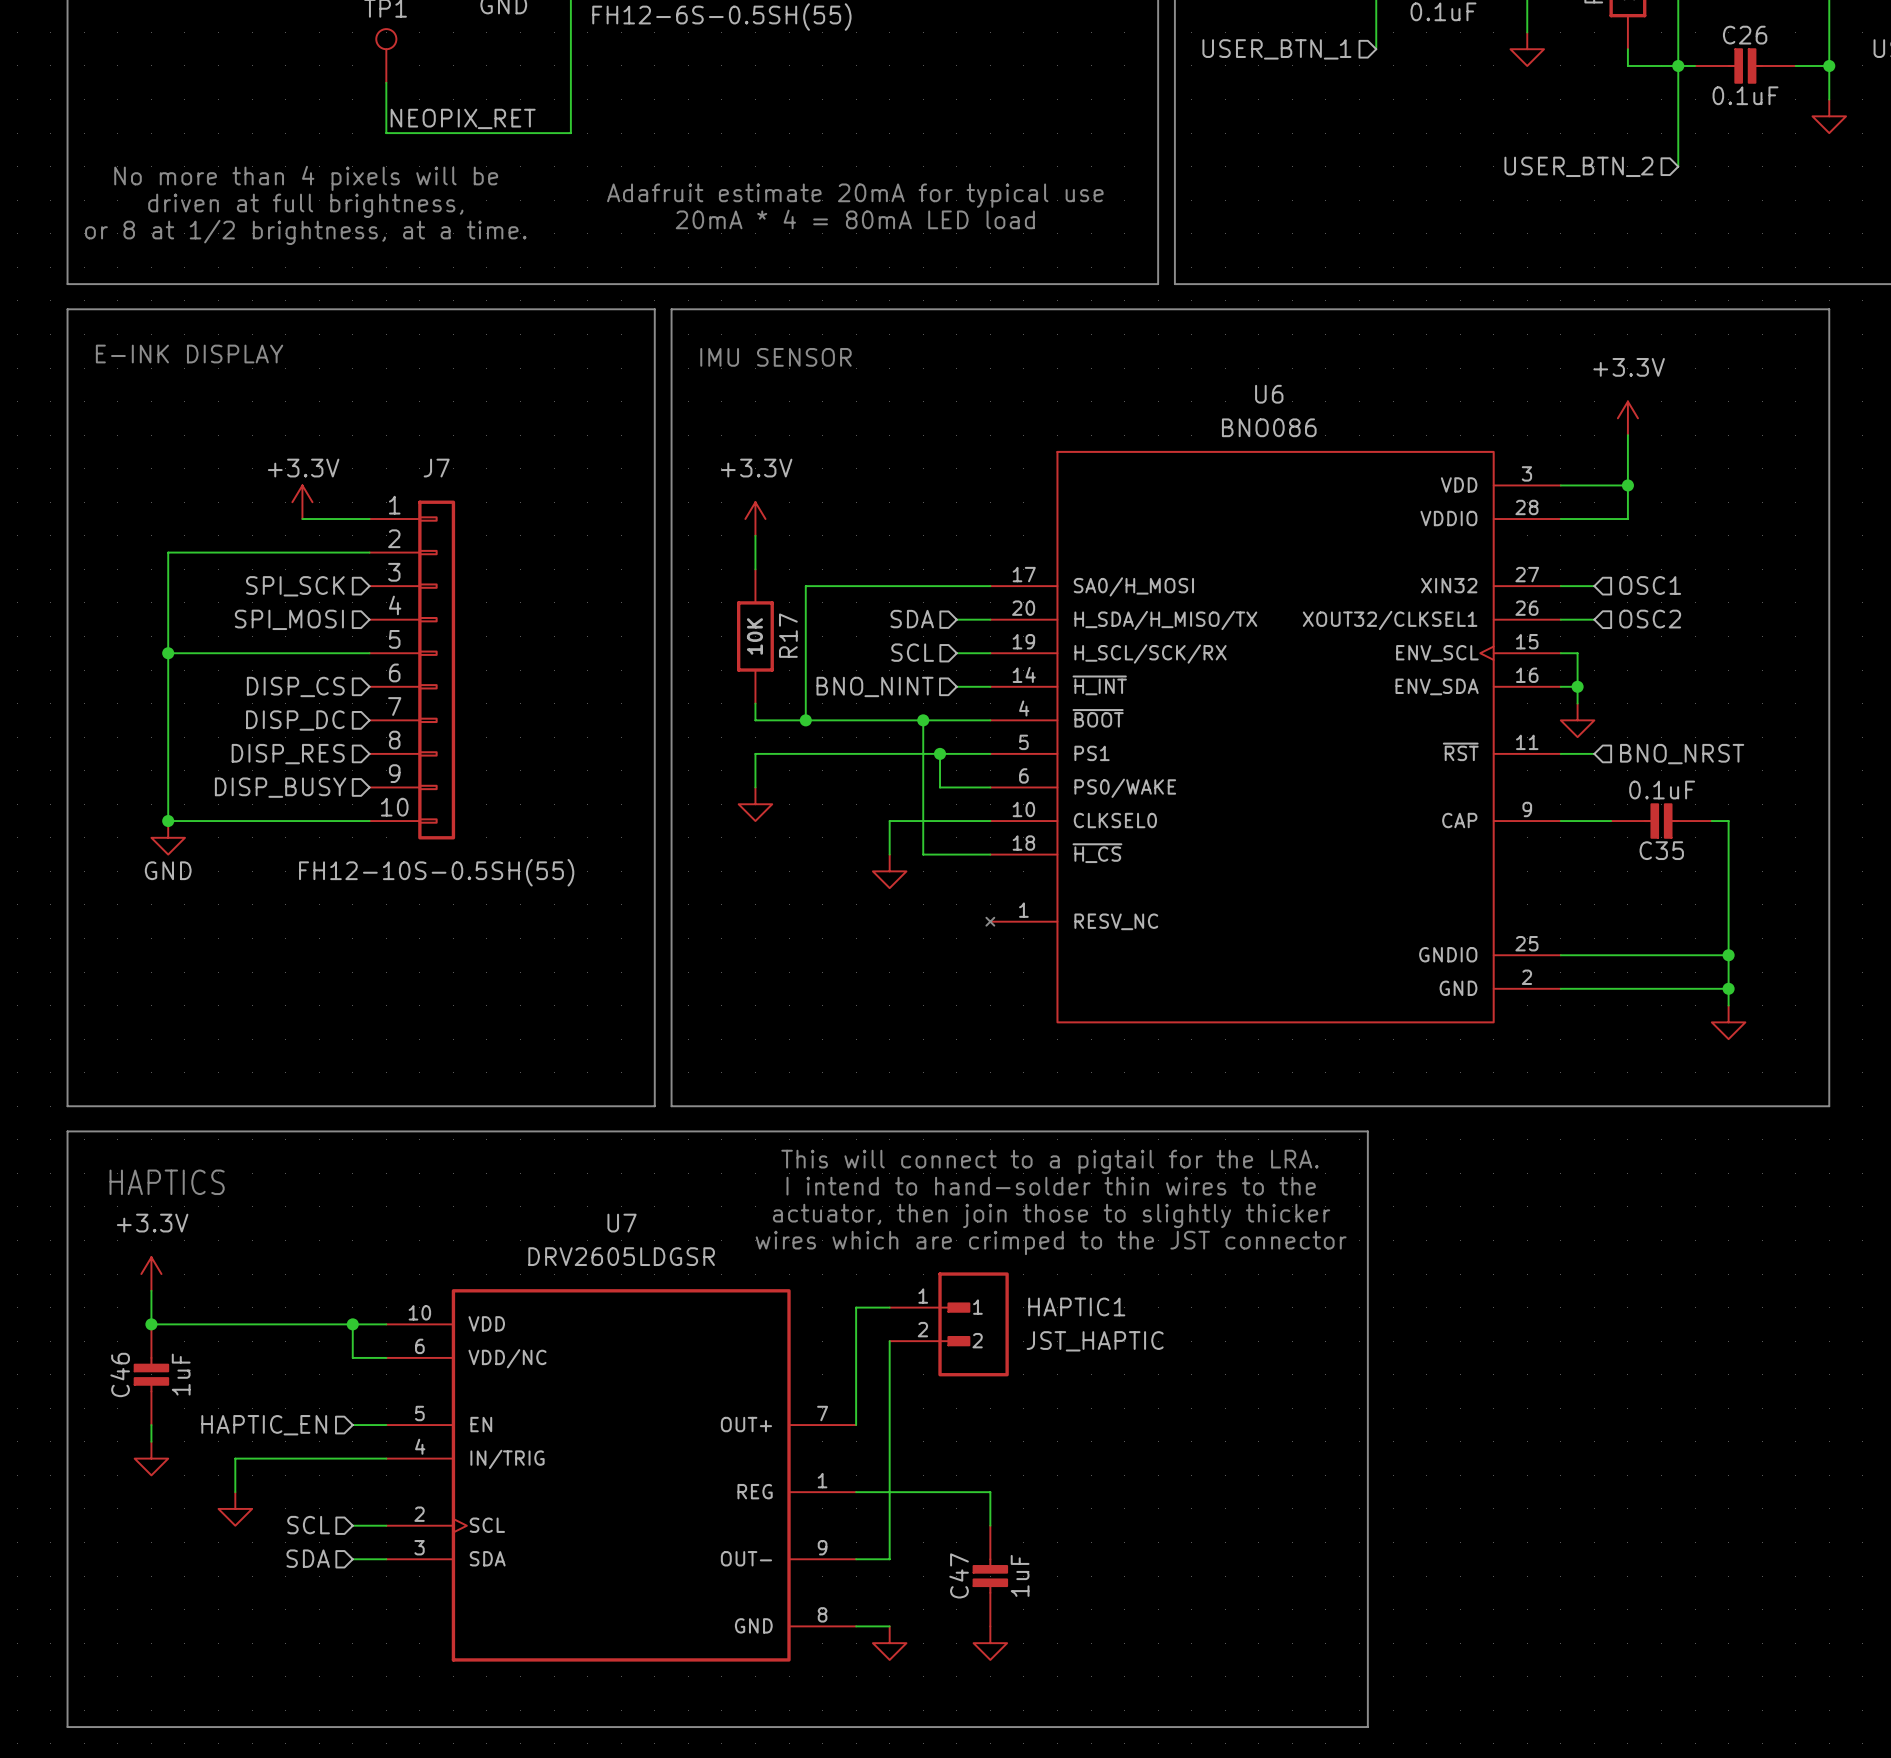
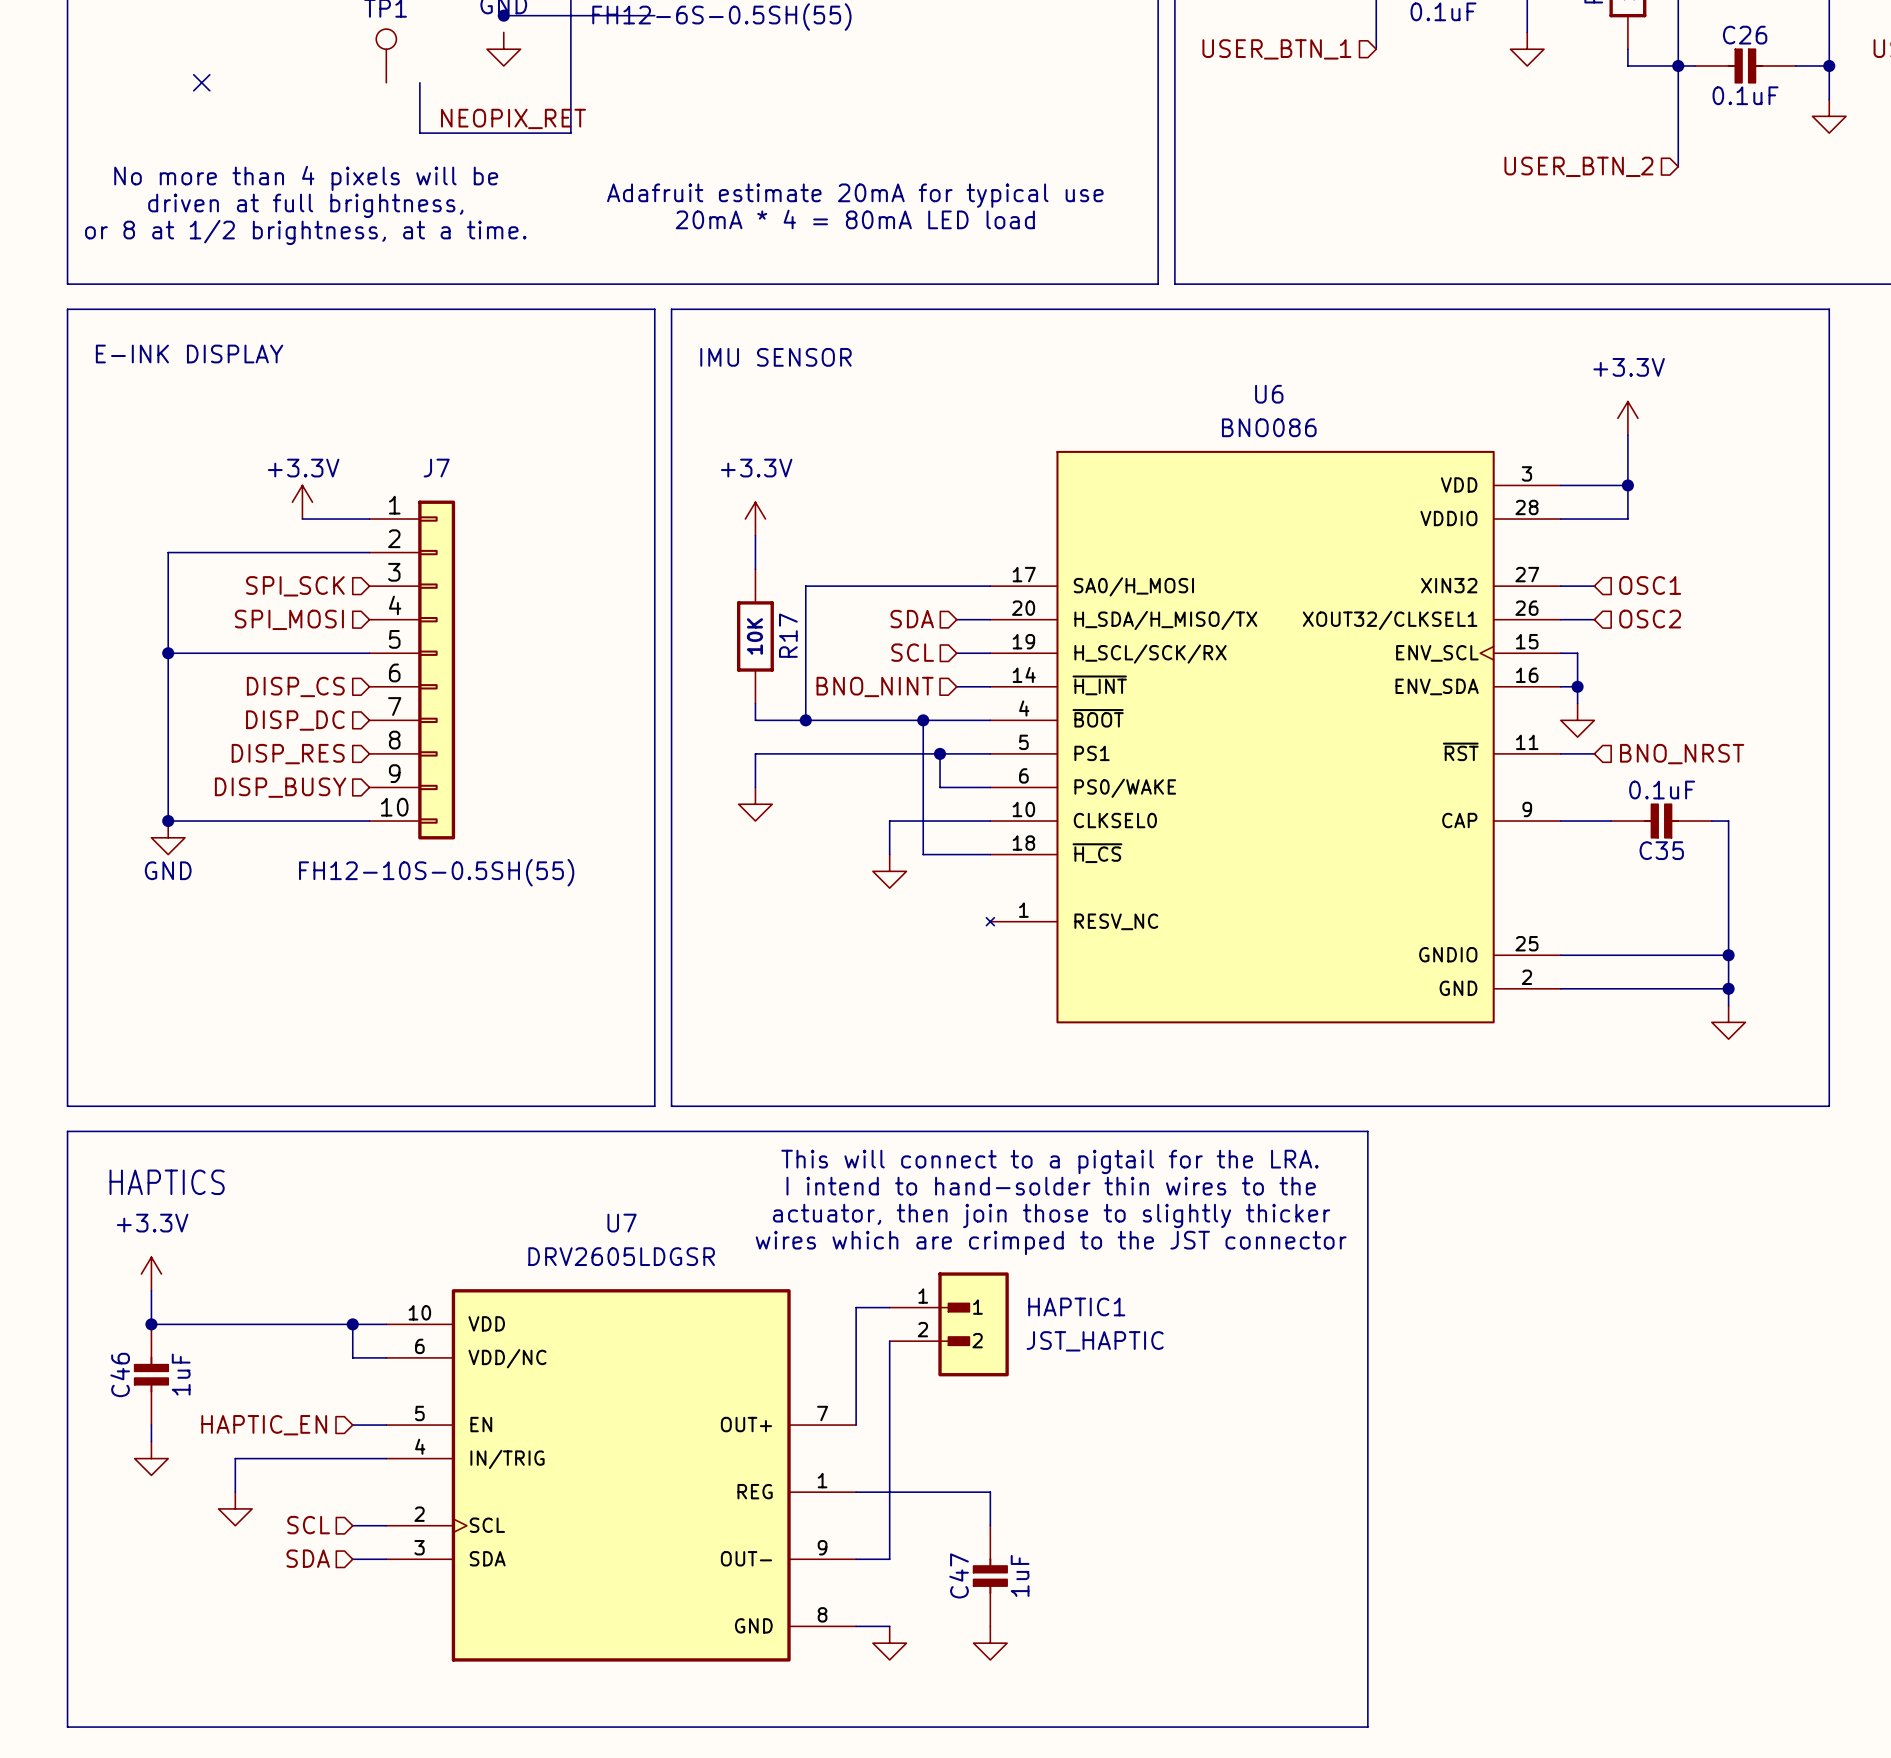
wire: none -> (503, 15) (654, 15)
junction: none -> (503, 15)
power symbol: none -> (503, 49)
no-connect mark: none -> (201, 82)
wire: (386, 82) (386, 133) (419, 133) -> (419, 82) (419, 133)
label position: NEOPIX_RET (463, 118) -> NEOPIX_RET (513, 118)

